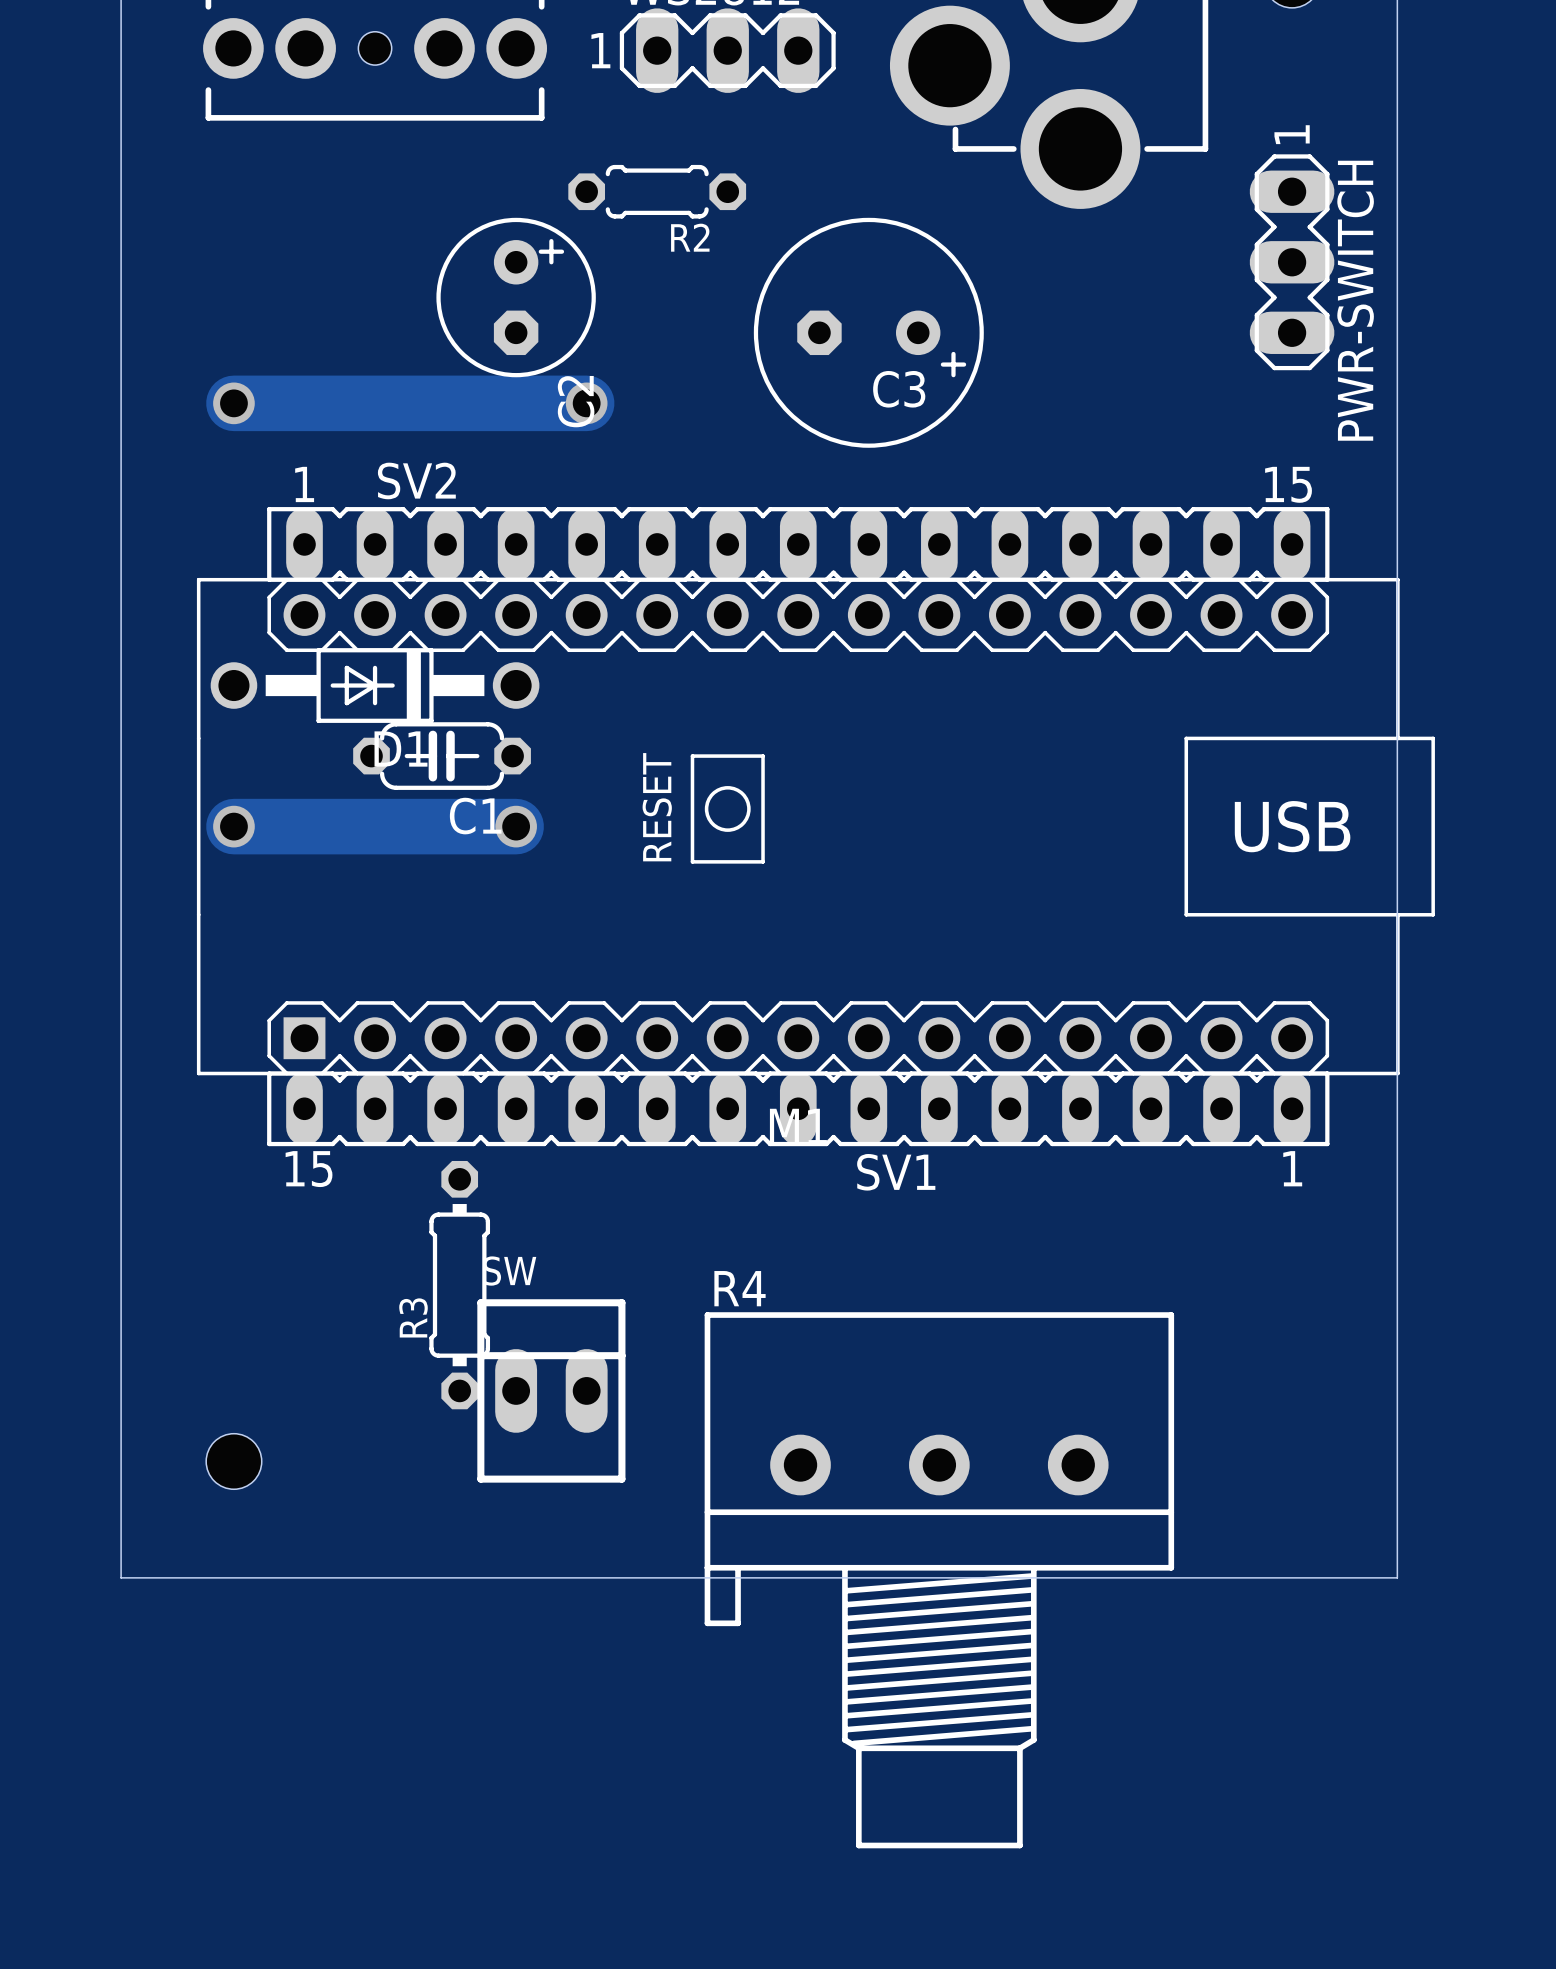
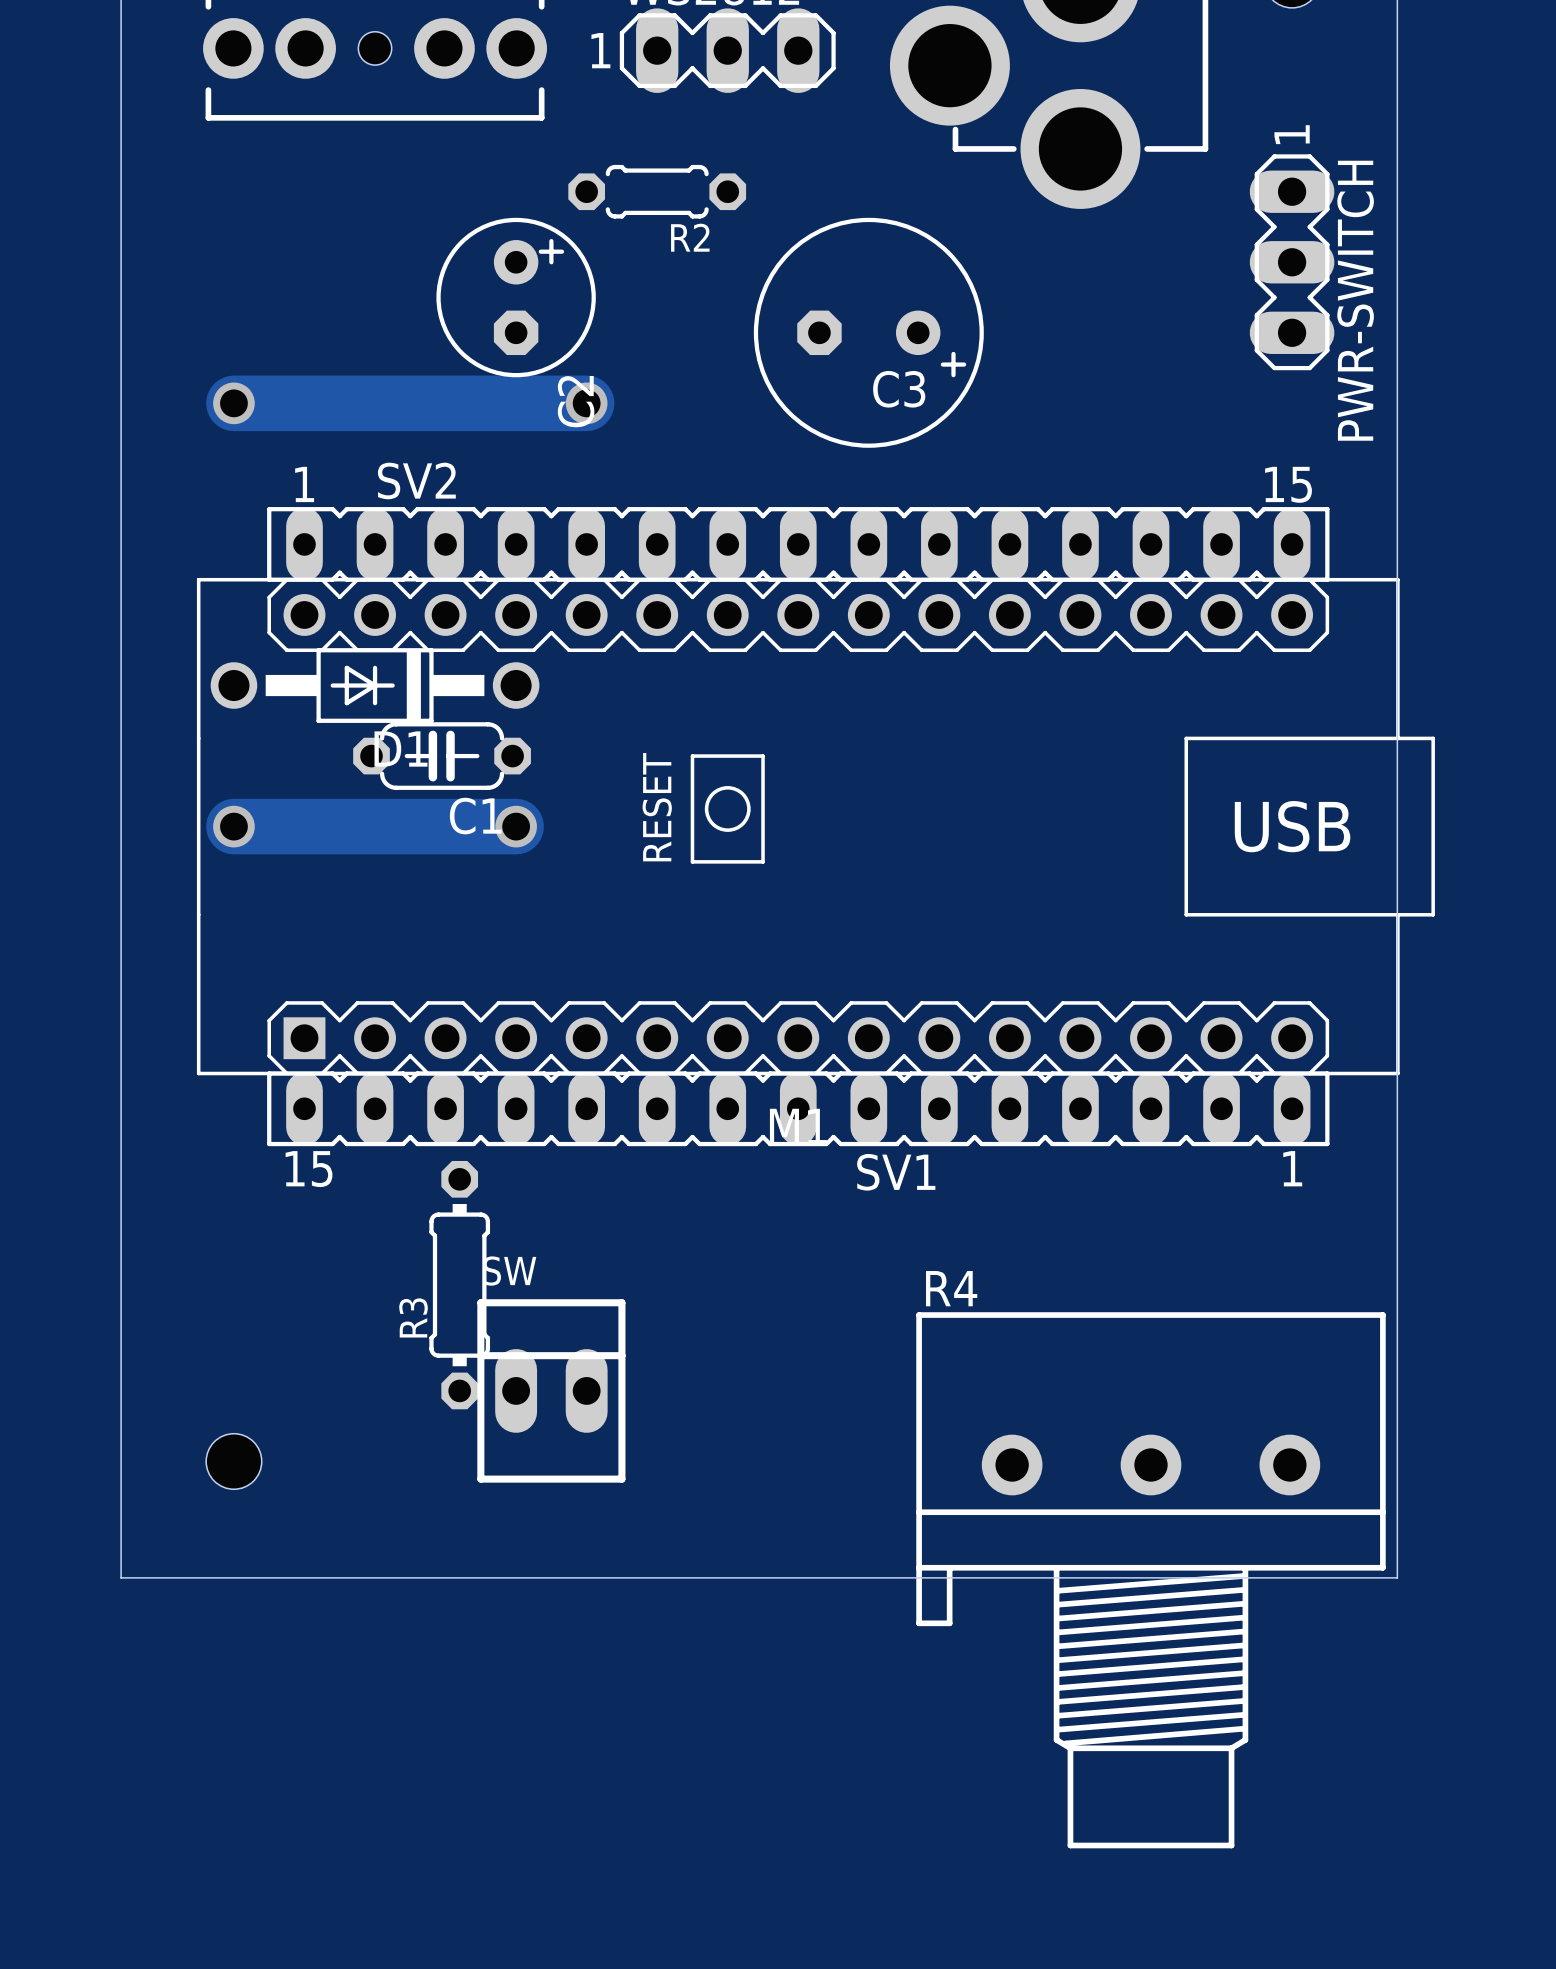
R4 position: (939, 1580) -> (1151, 1580)

